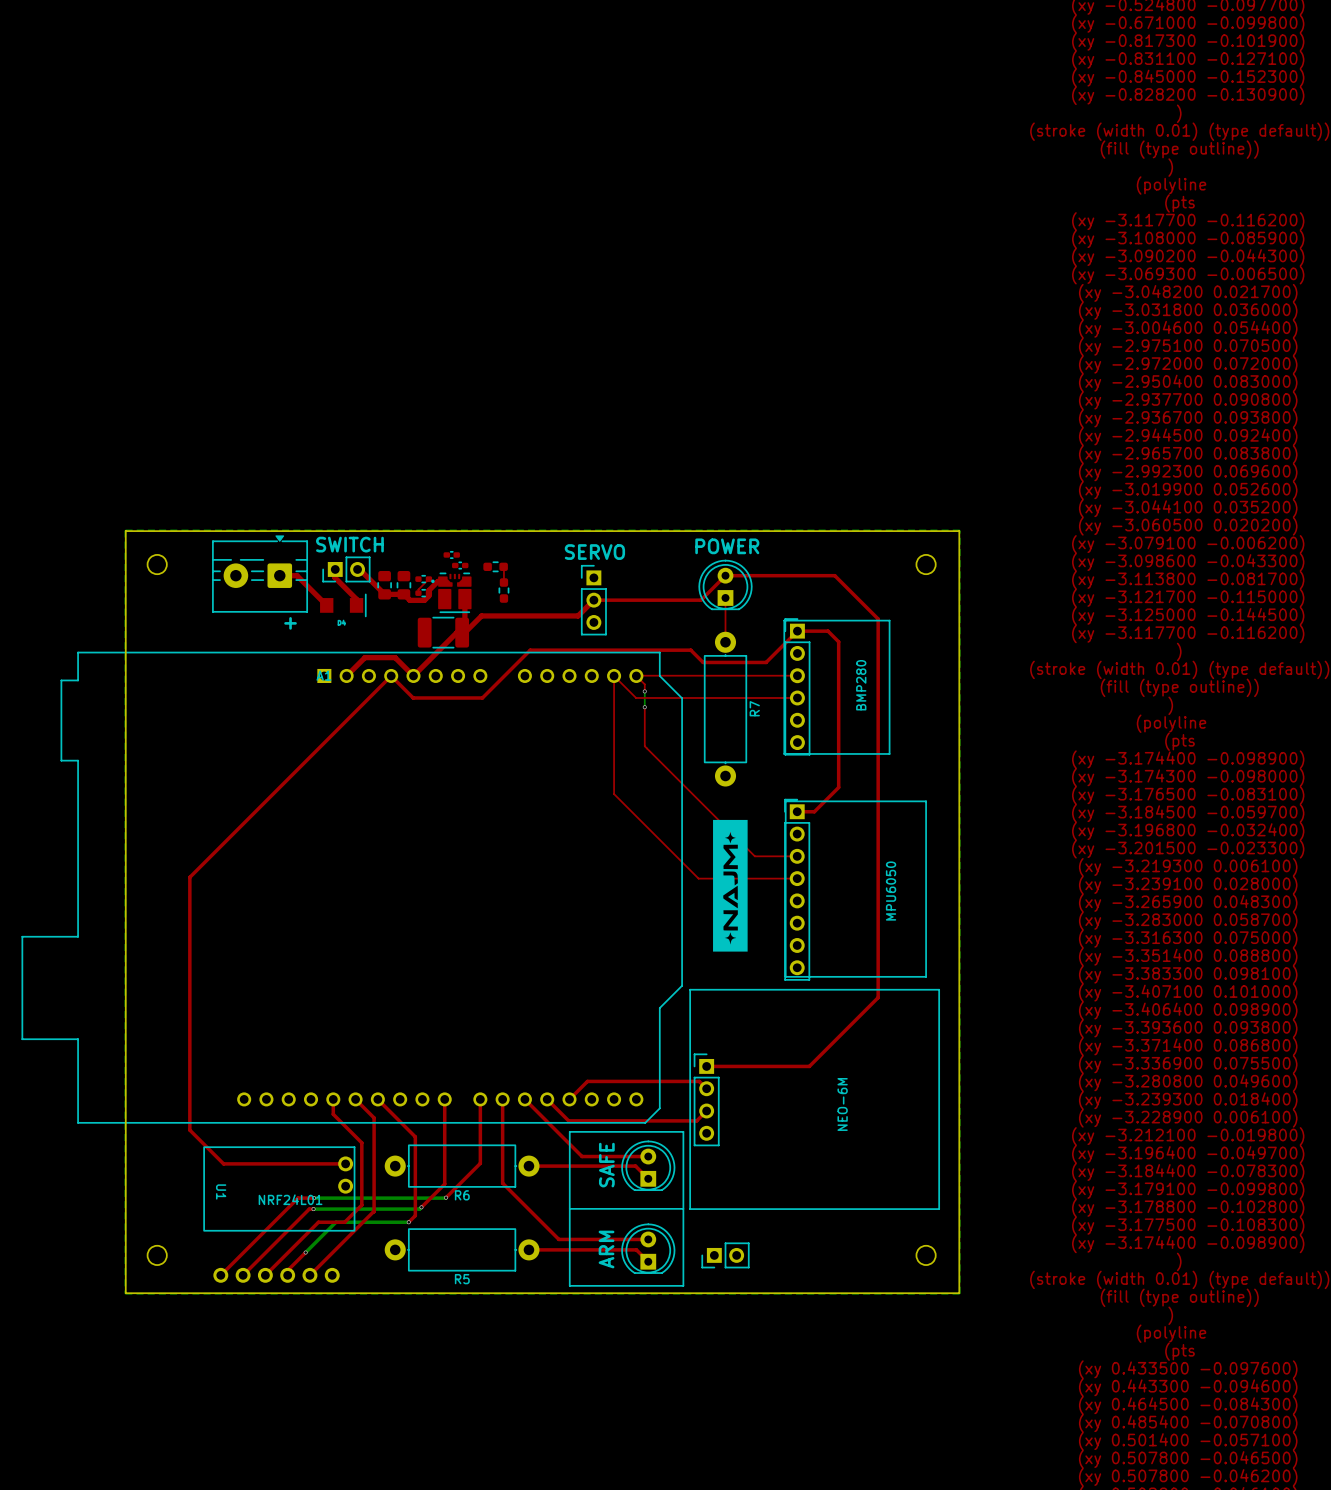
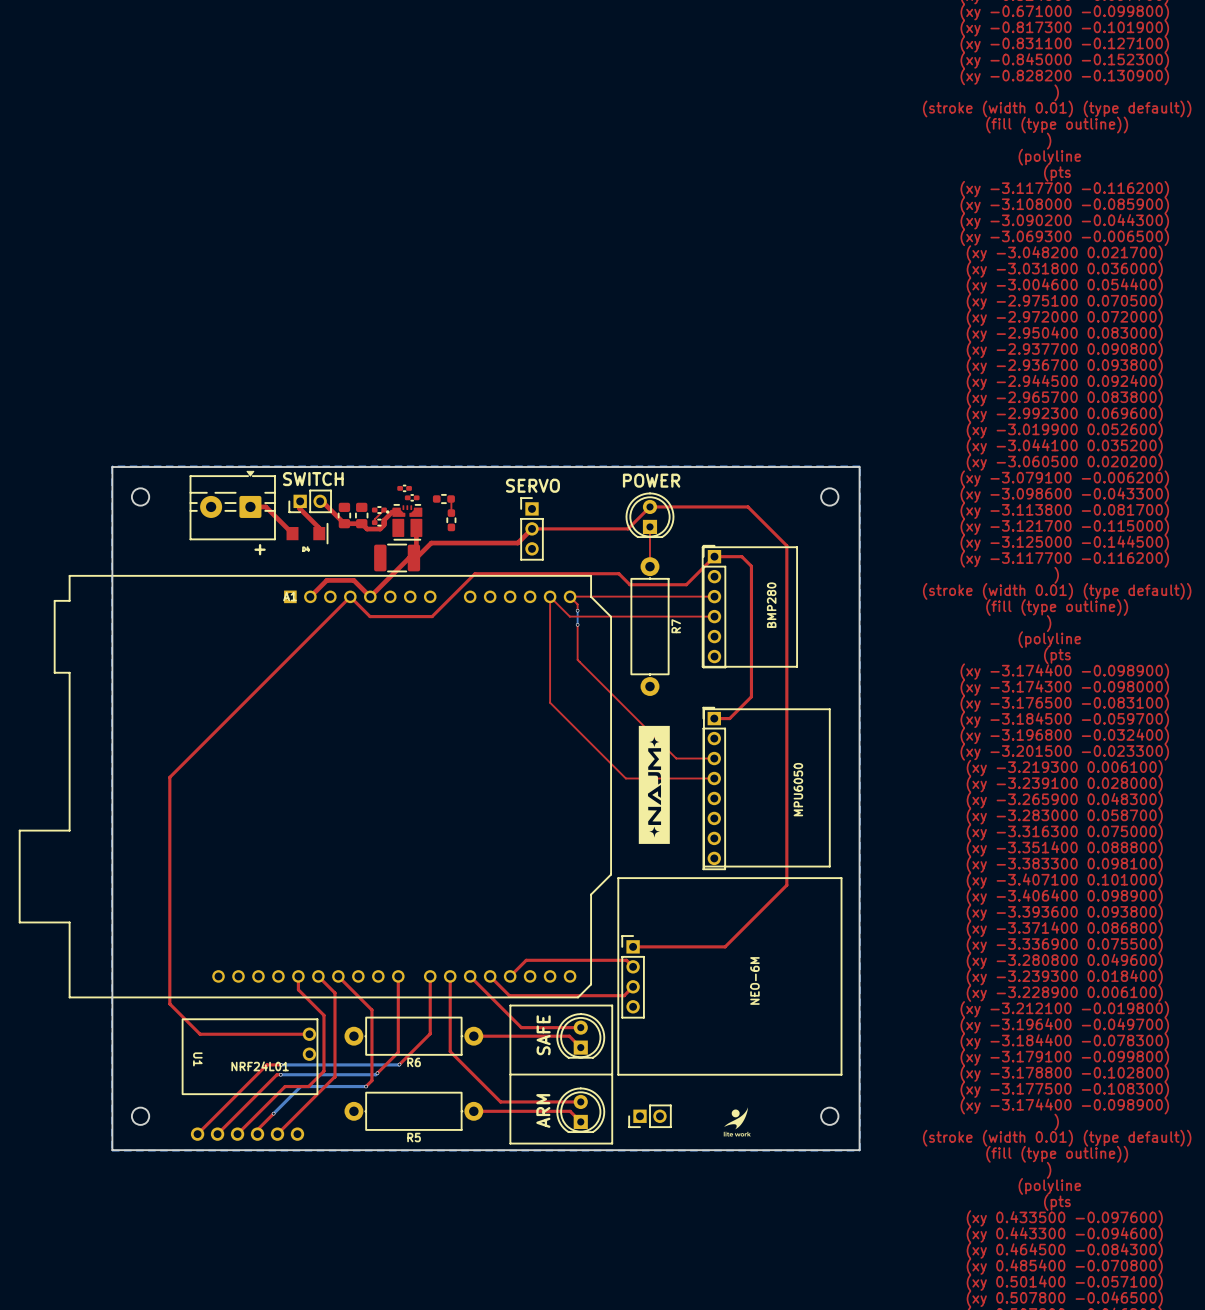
drawing: none -> [723, 1107, 751, 1137]

